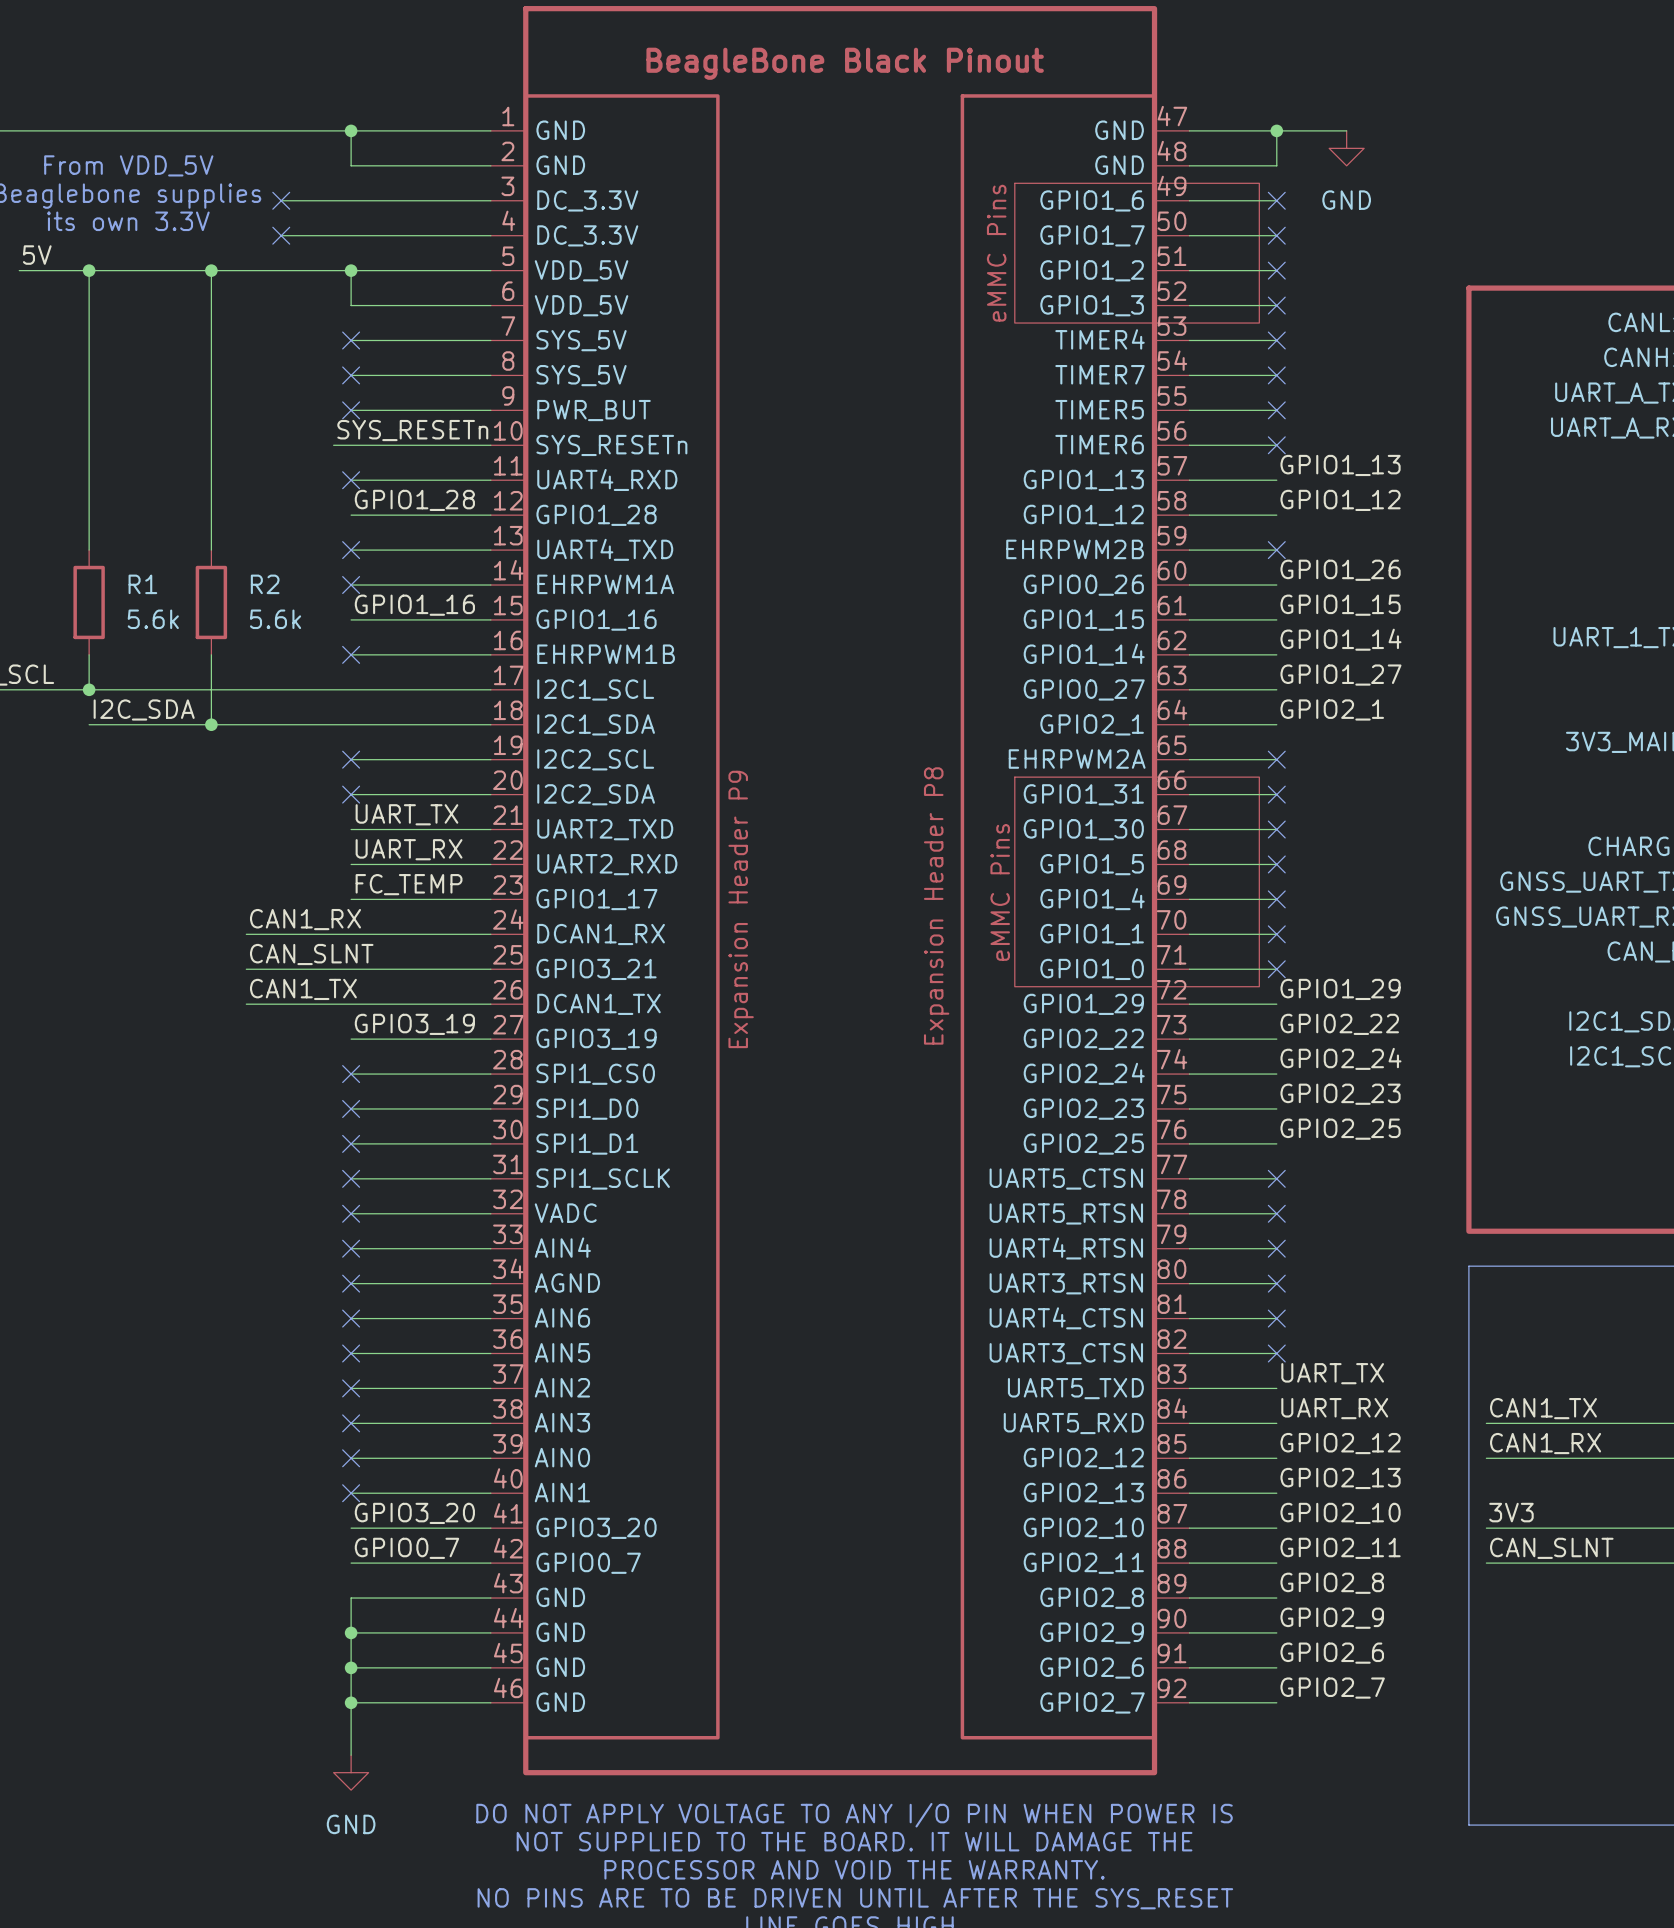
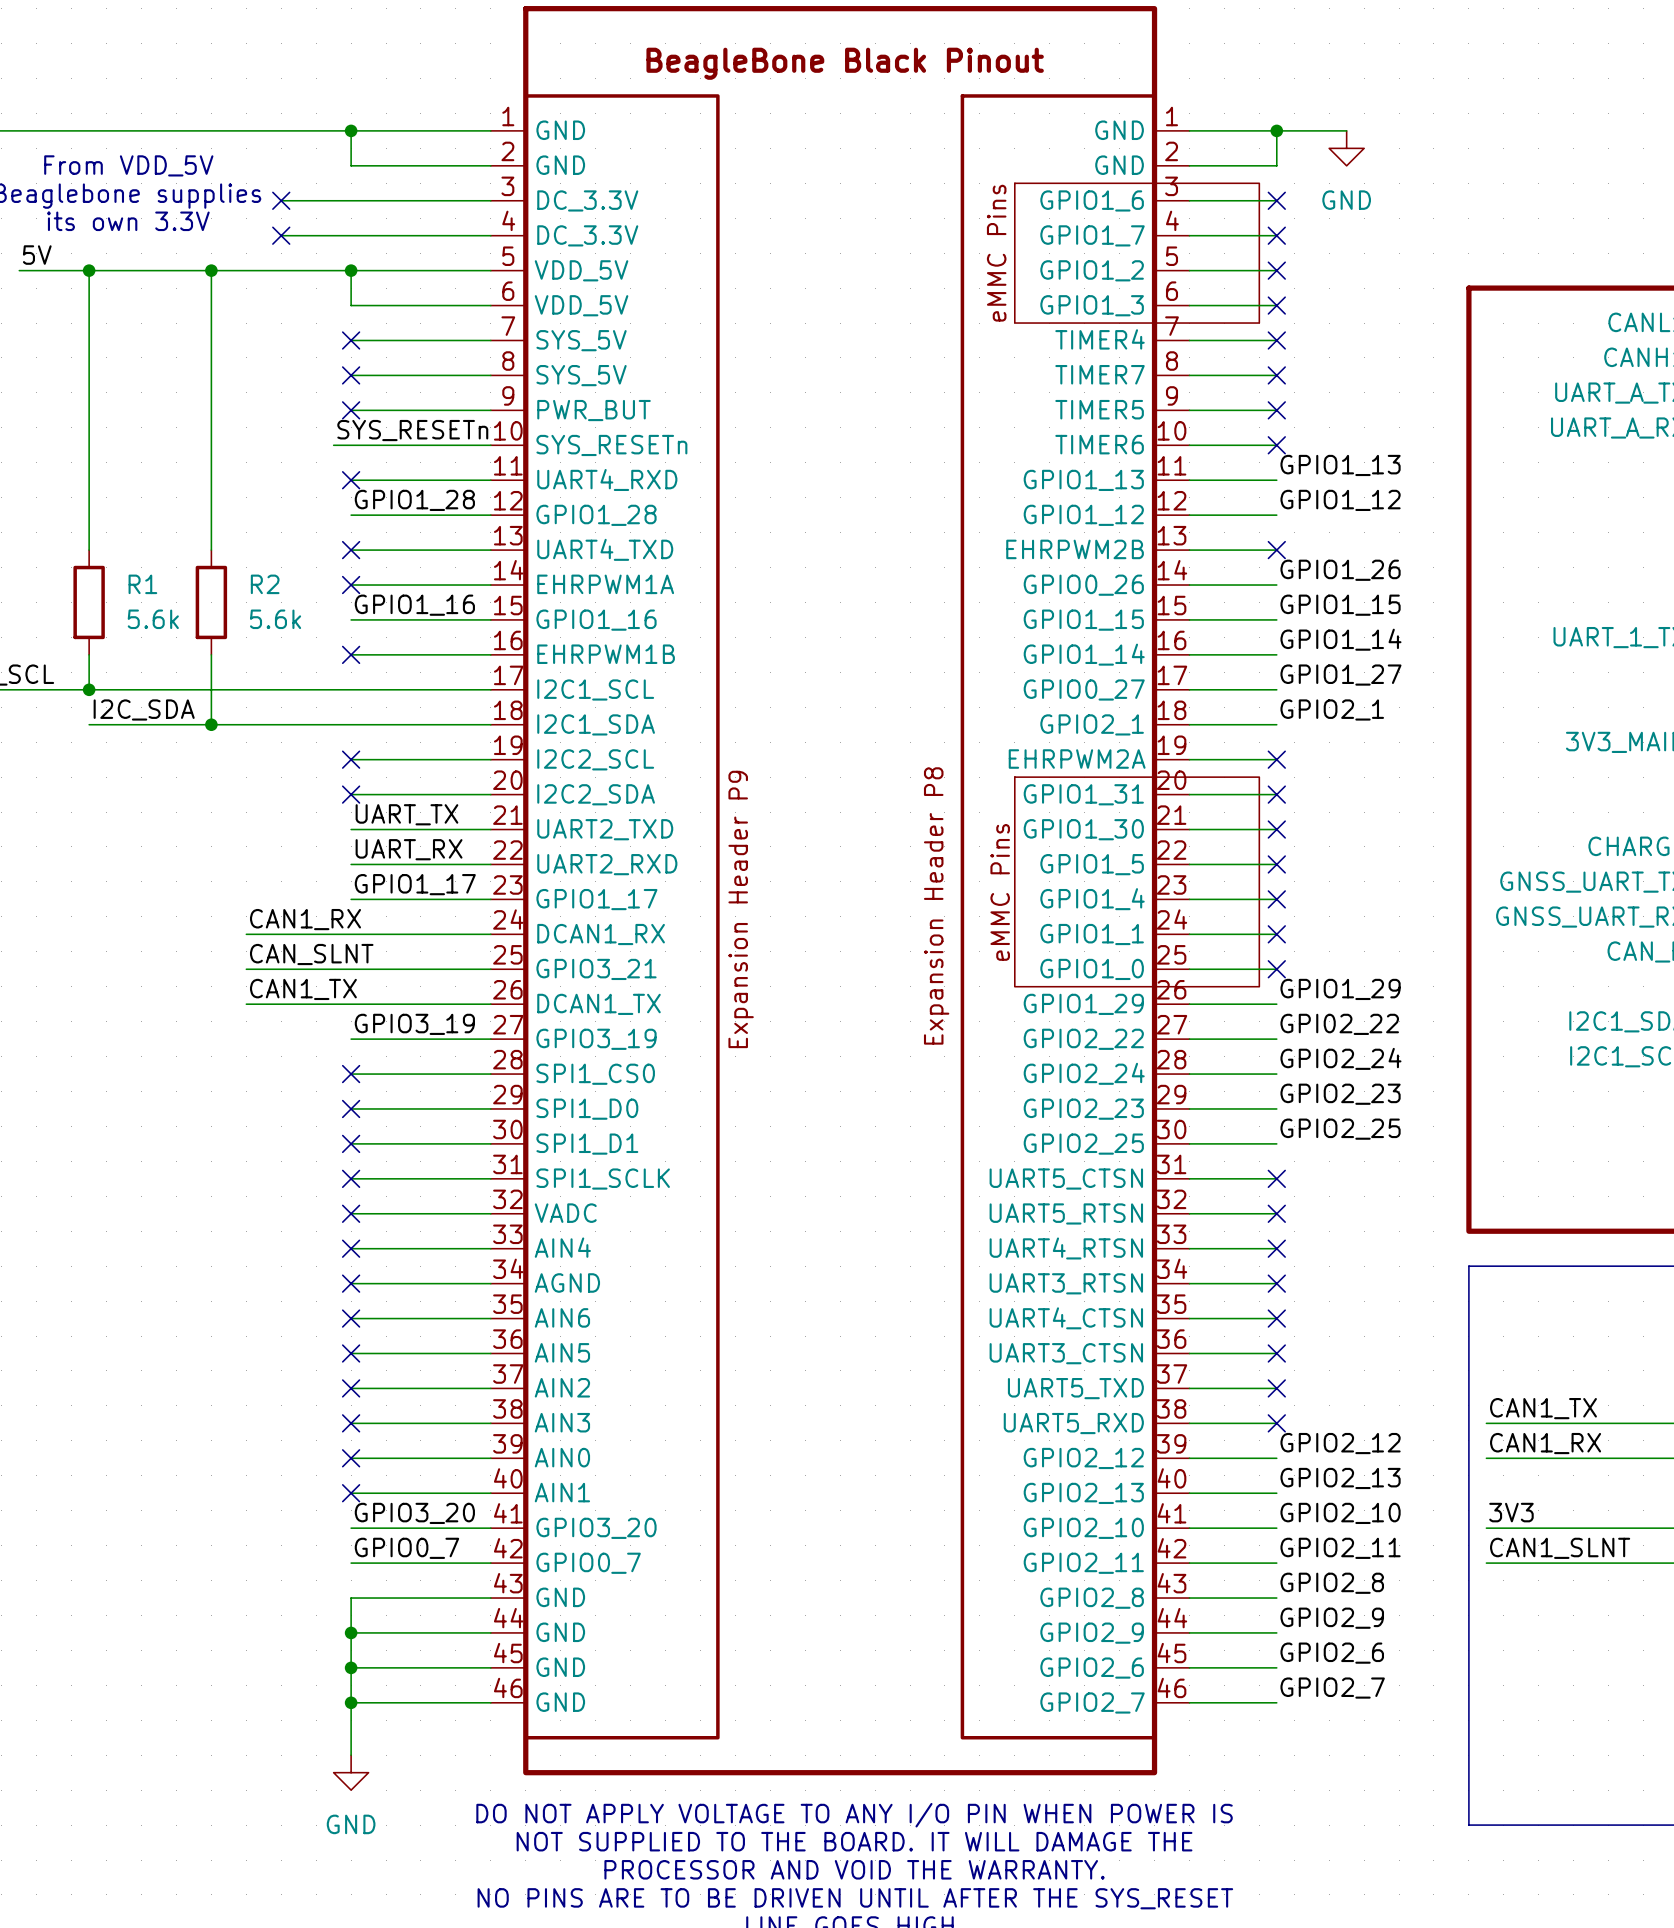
part symbol: [490, 6, 1260, 1776] -> [490, 6, 1260, 1776]
label: FC_TEMP (409, 884) -> GPIO1_17 (415, 884)
label: UART_TX (1332, 1373) -> none
no-connect mark: none -> (1276, 1388)
label: UART_RX (1334, 1408) -> none
no-connect mark: none -> (1276, 1423)
label: CAN_SLNT (1551, 1548) -> CAN1_SLNT (1560, 1548)

